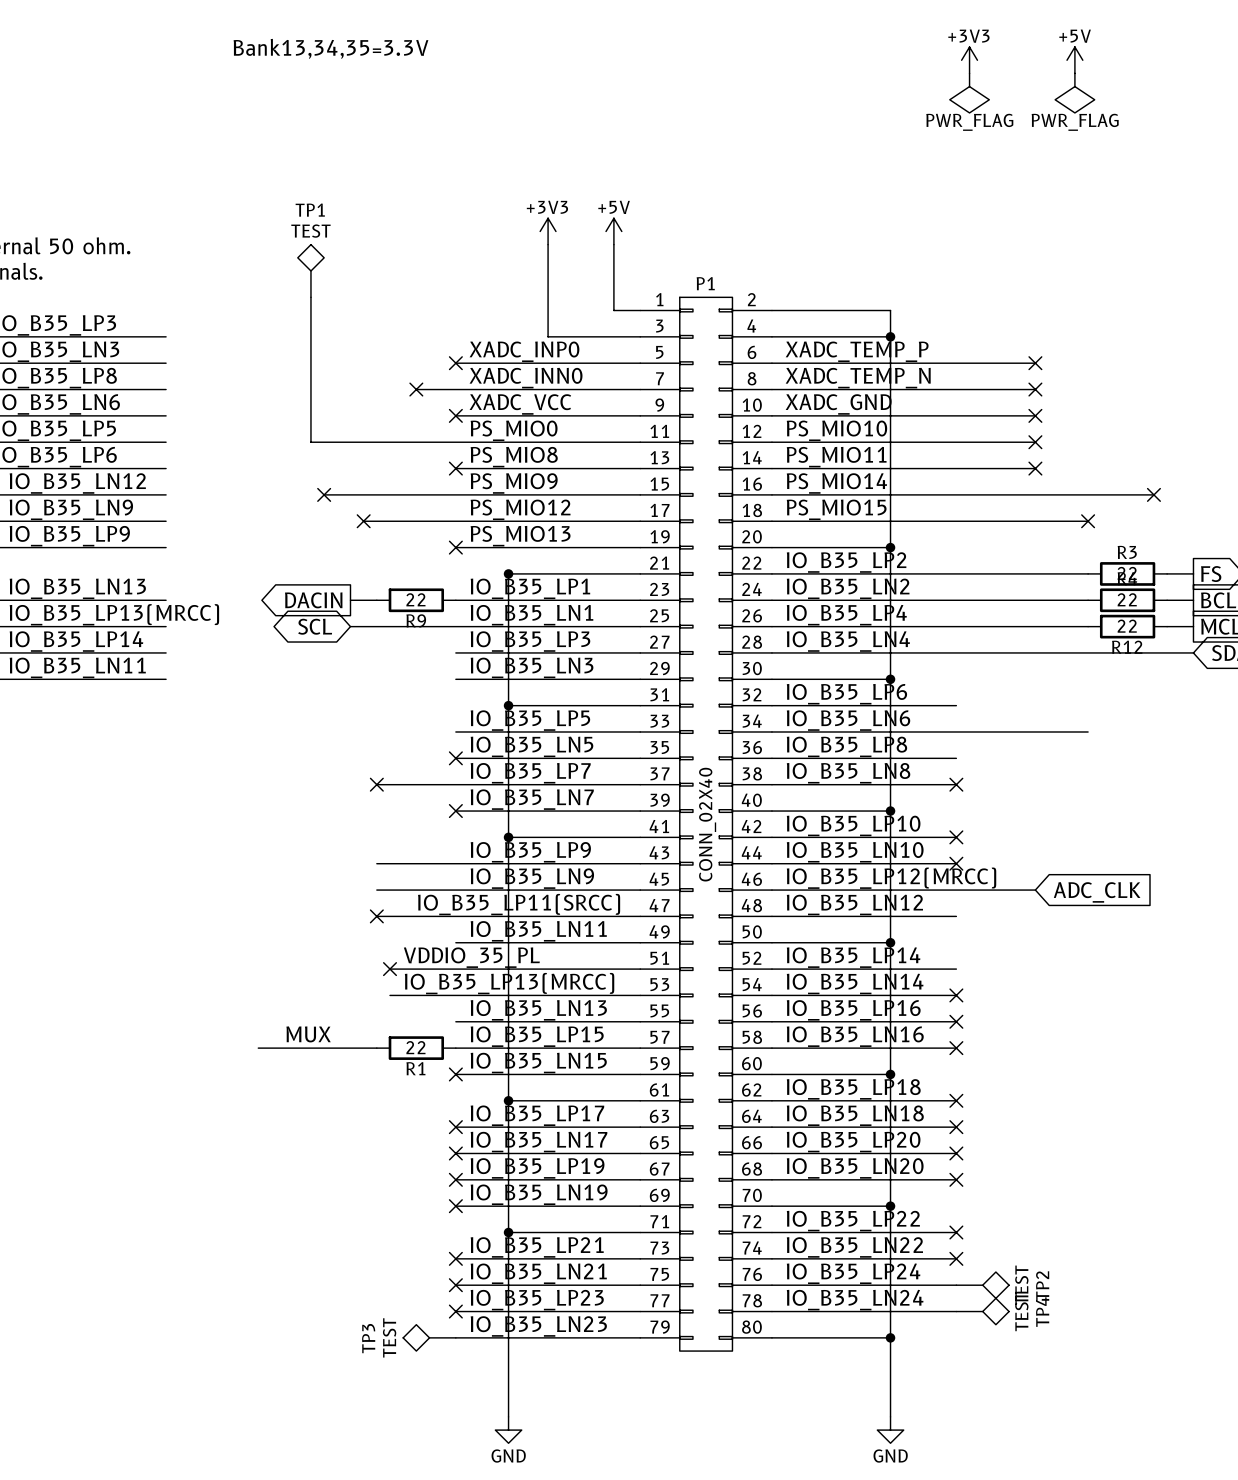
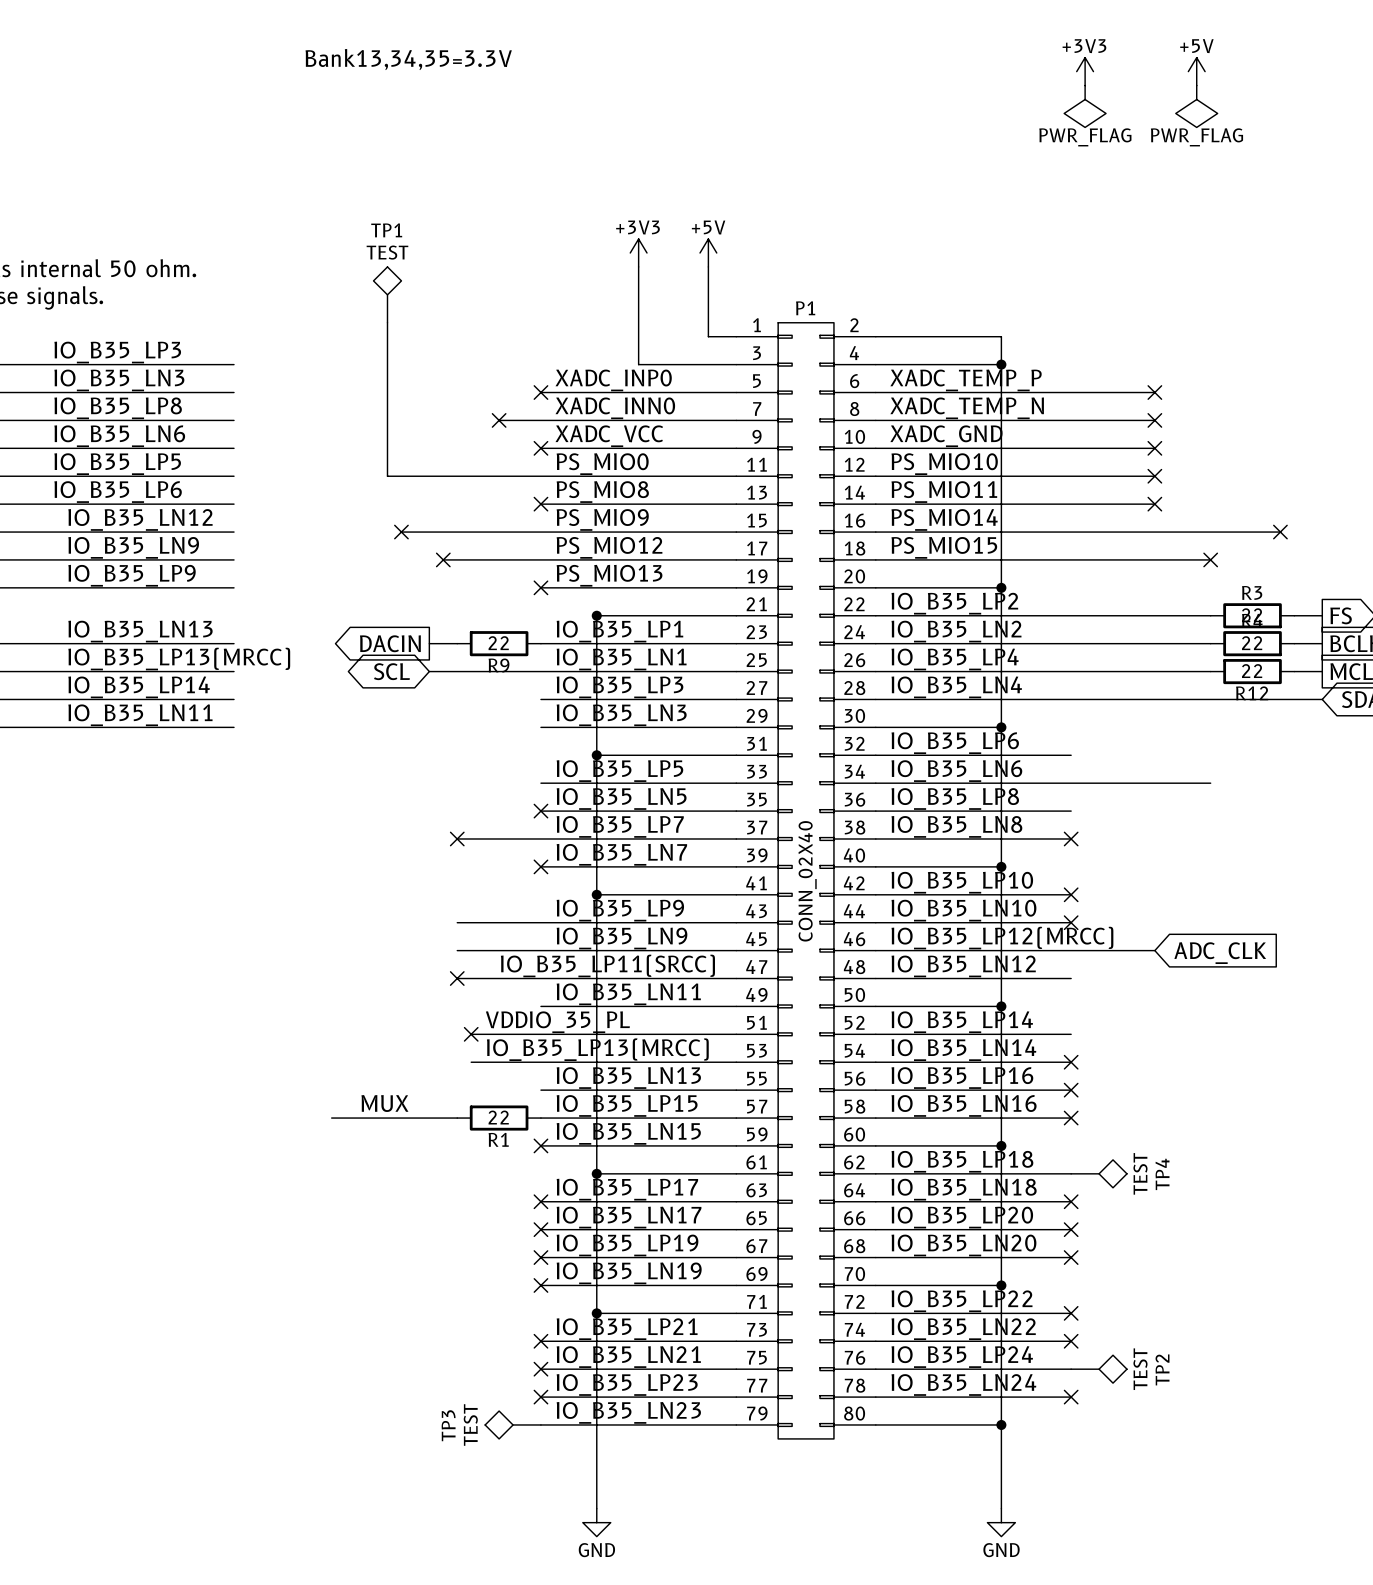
no-connect mark: (956, 1100) -> none
no-connect mark: none -> (1071, 1397)
TP4 position: (982, 1311) -> (1099, 1173)

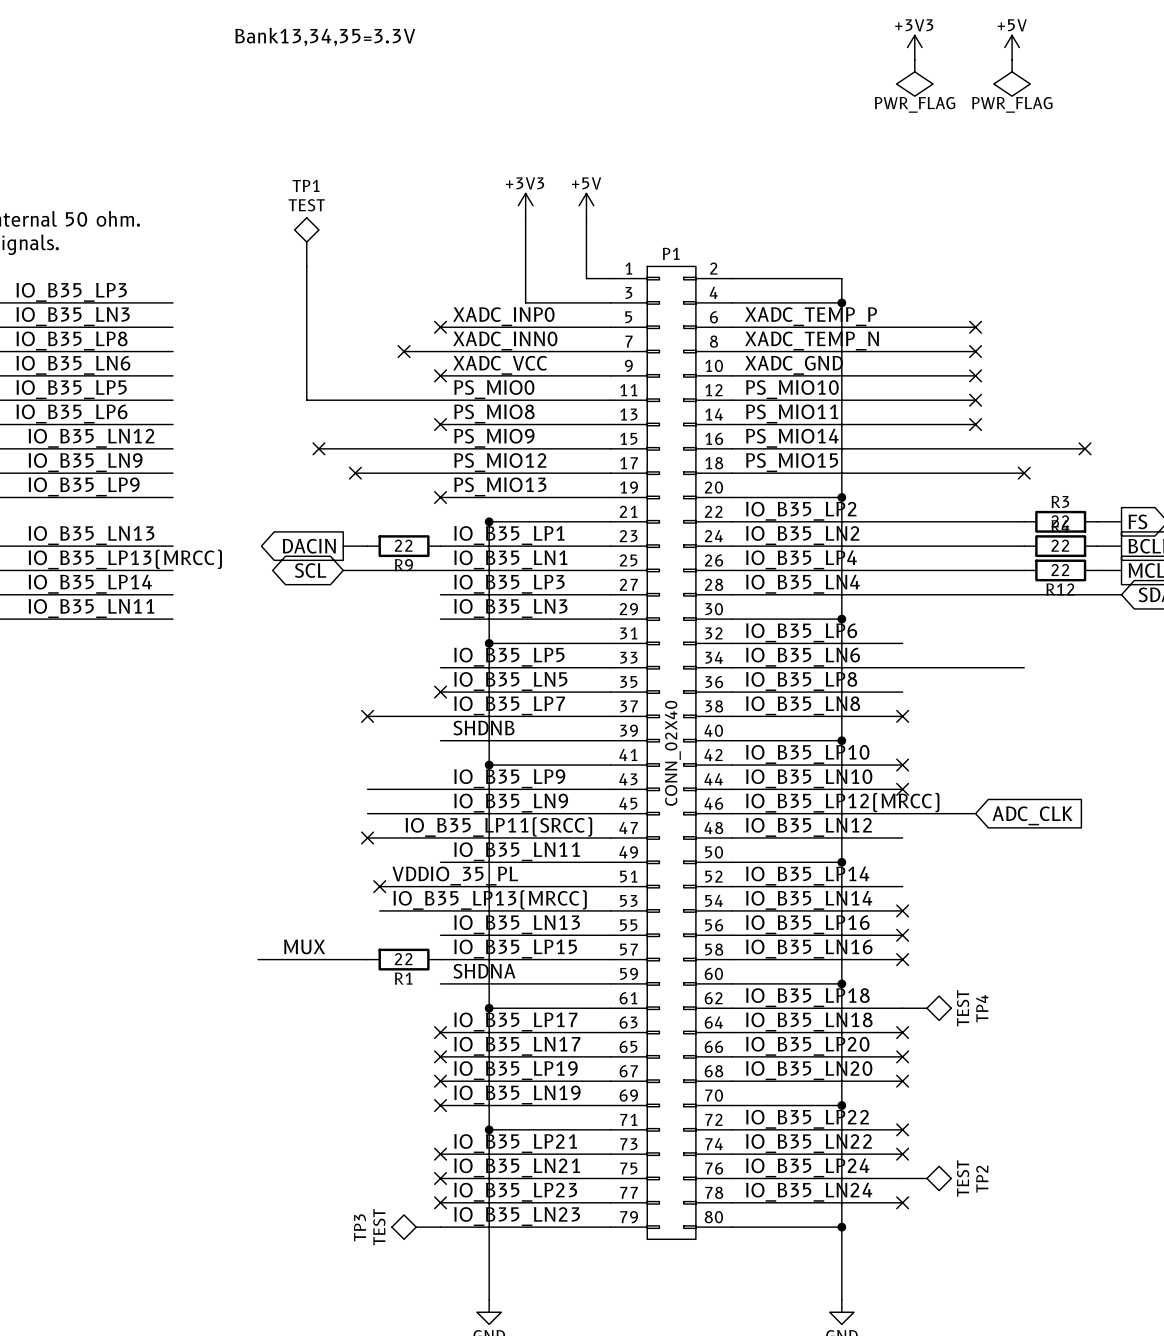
label: IO_B35_LN7 (621, 854) -> SHDNB (484, 728)
no-connect mark: (540, 866) -> none
label: IO_B35_LN15 (628, 1133) -> SHDNA (484, 971)
no-connect mark: (540, 1145) -> none

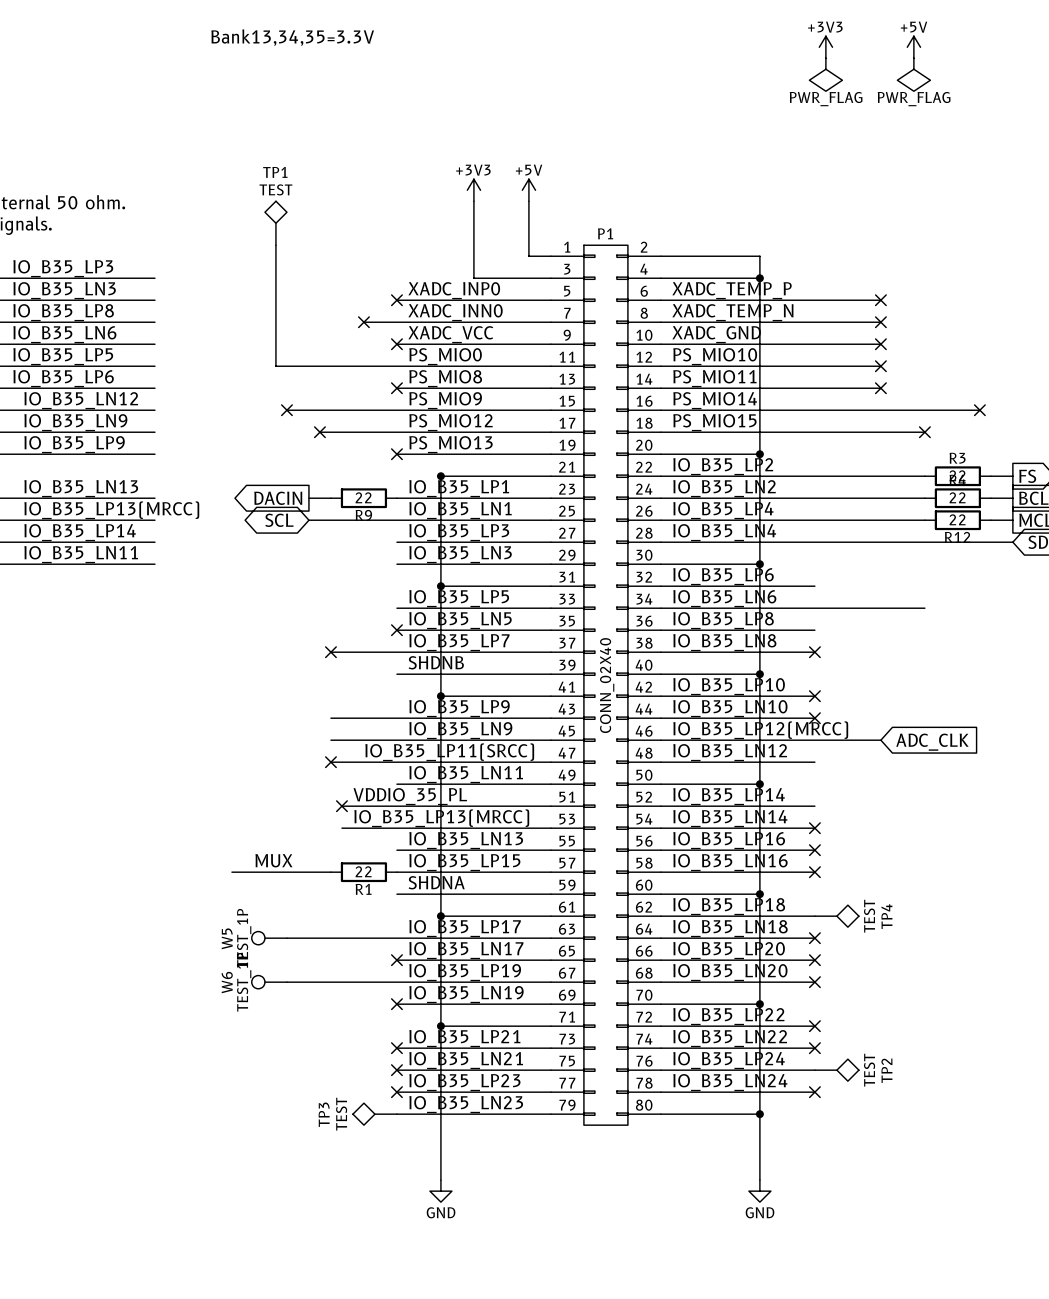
W5: none -> TEST_1P (269, 938)
wire: none -> (286, 938) (396, 938)
no-connect mark: (440, 1032) -> none
W6: none -> TEST_1P (269, 982)
wire: none -> (286, 982) (396, 982)
no-connect mark: (440, 1081) -> none

